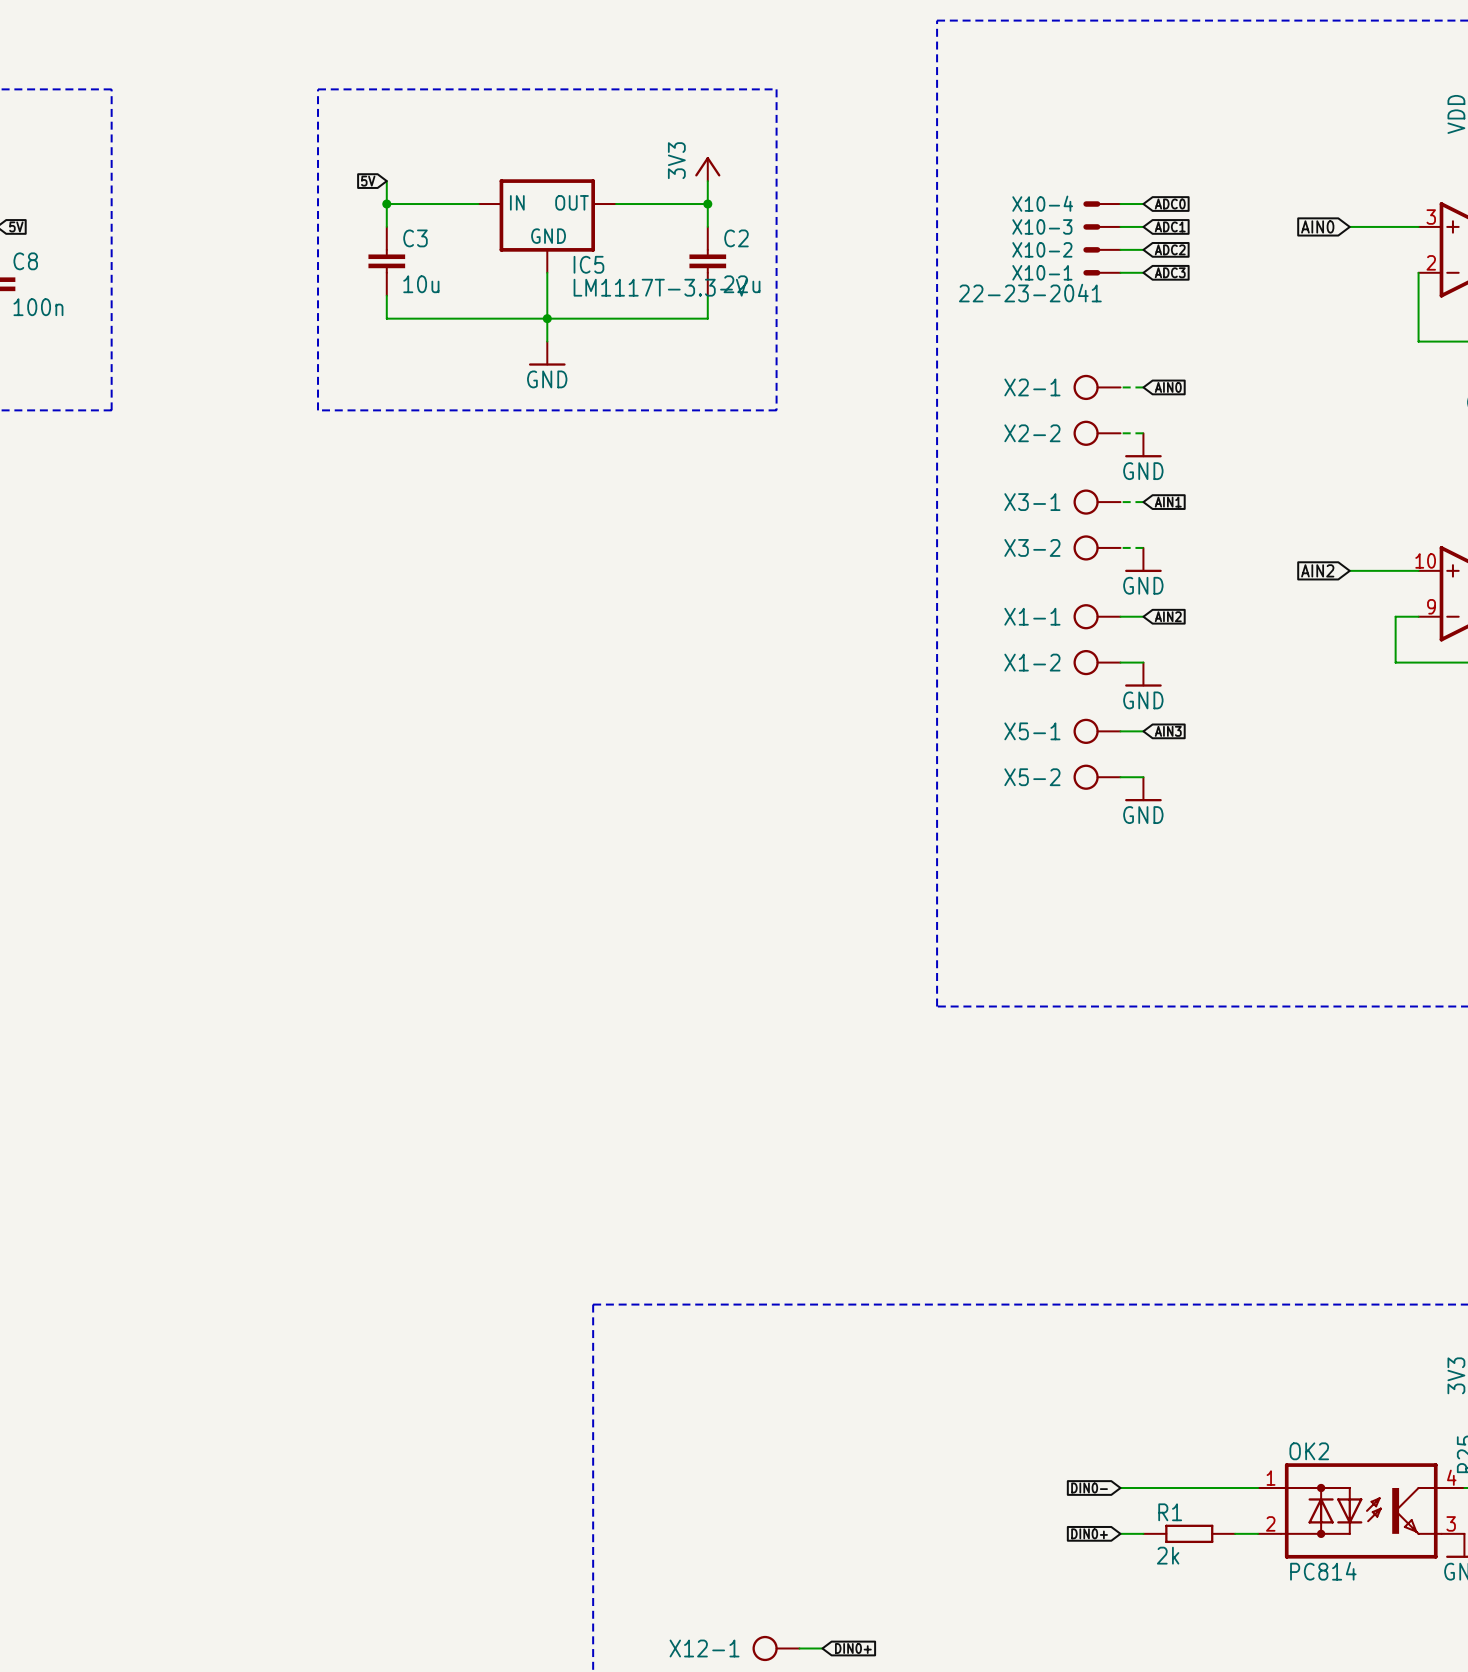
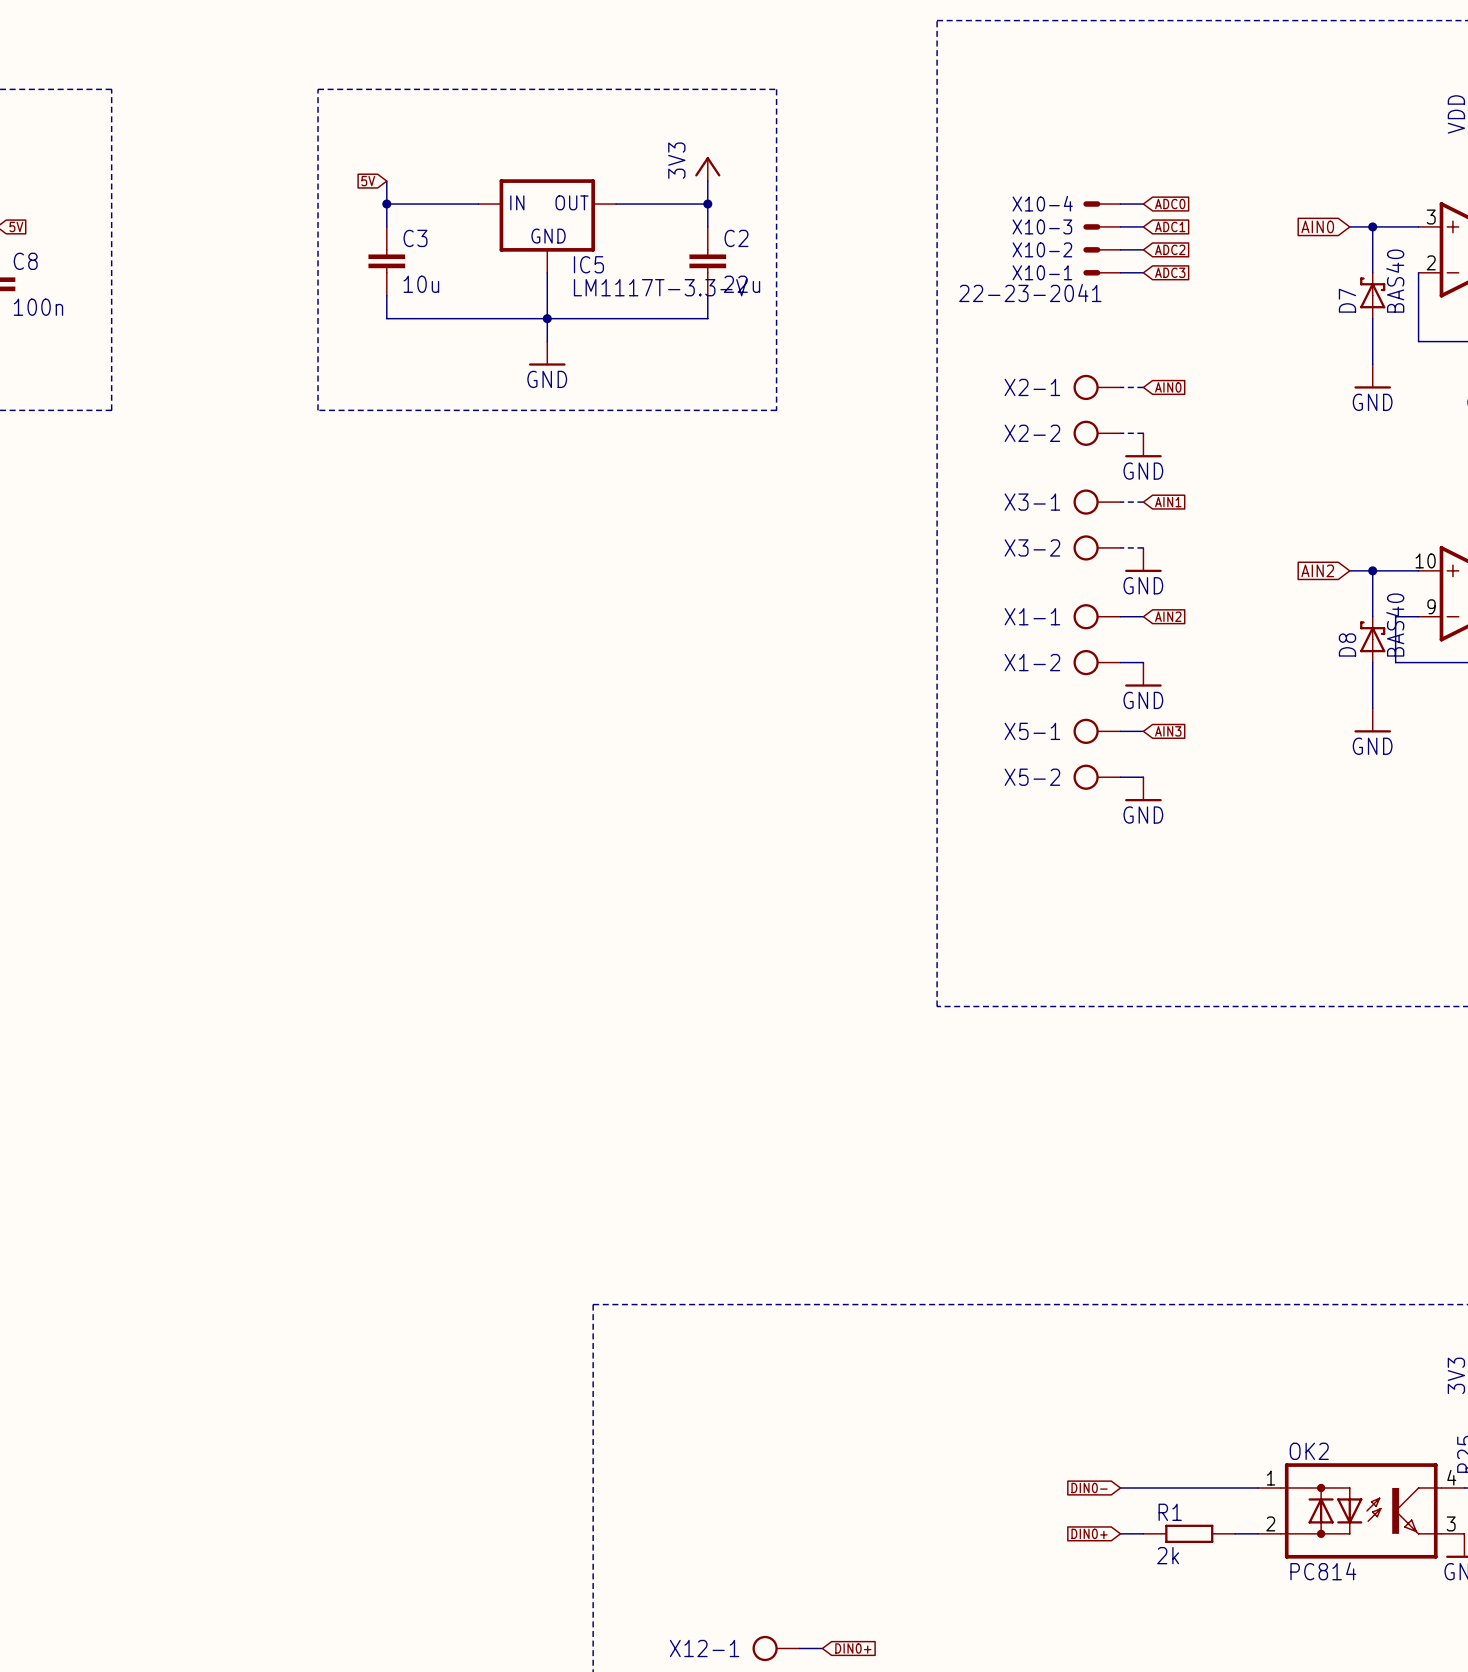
wire: none -> (1372, 226) (1372, 272)
junction: none -> (1372, 226)
D7: none -> BAS40 (1372, 295)
wire: none -> (1372, 318) (1372, 364)
power symbol: none -> GND (1372, 376)
wire: none -> (1372, 570) (1372, 616)
junction: none -> (1372, 570)
D8: none -> BAS40 (1372, 639)
wire: none -> (1372, 662) (1372, 708)
power symbol: none -> GND (1372, 720)

